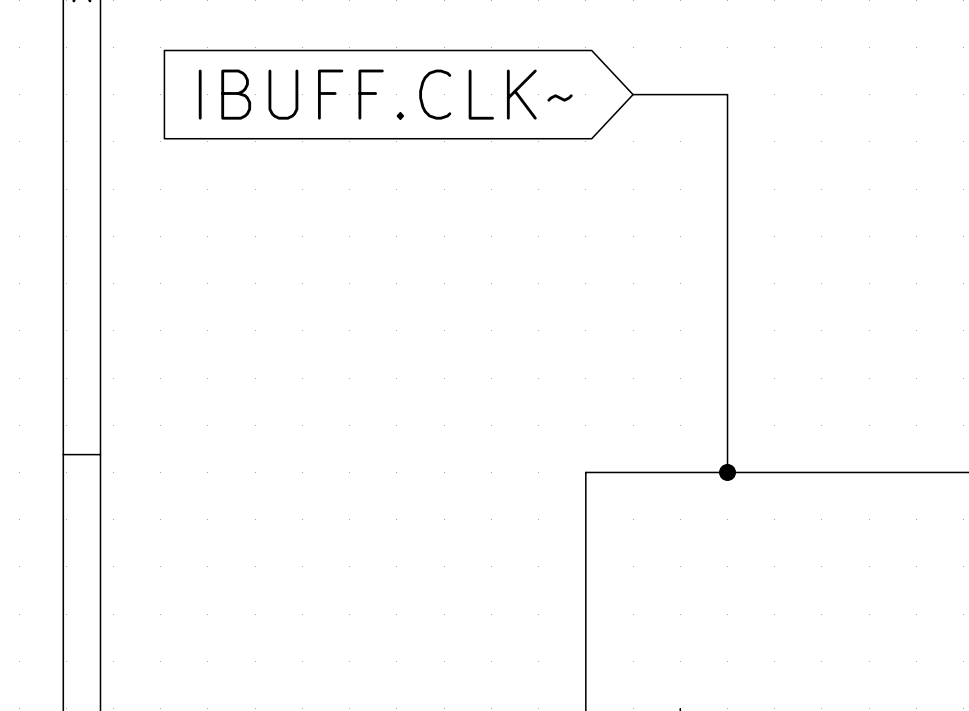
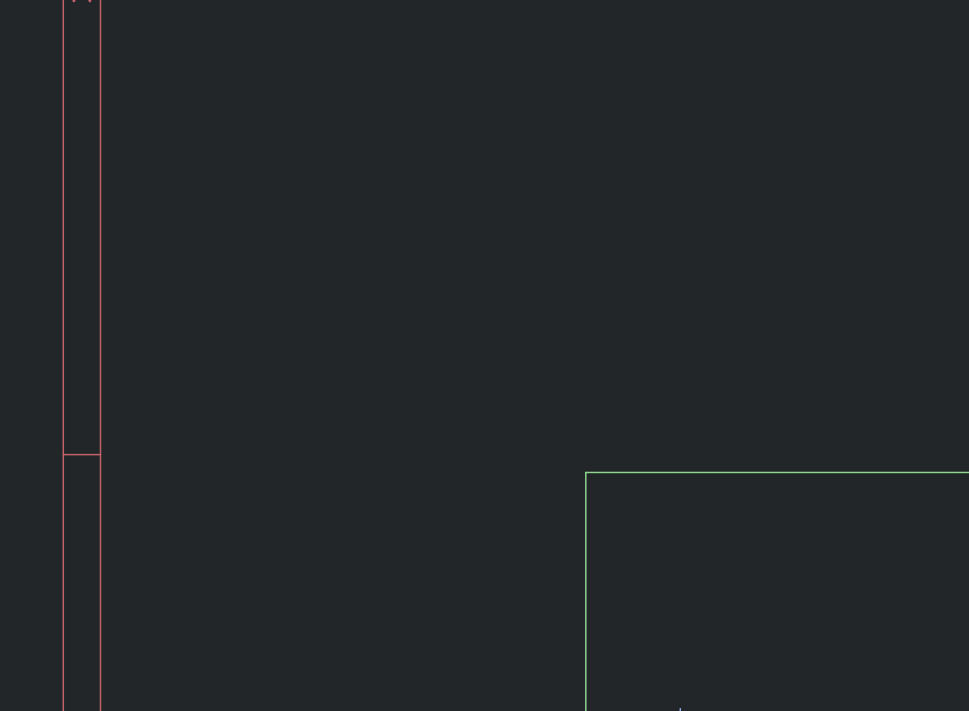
global label: IBUFF.CLK~ (385, 94) -> none
wire: (633, 94) (727, 94) (727, 472) -> none
junction: (727, 472) -> none

